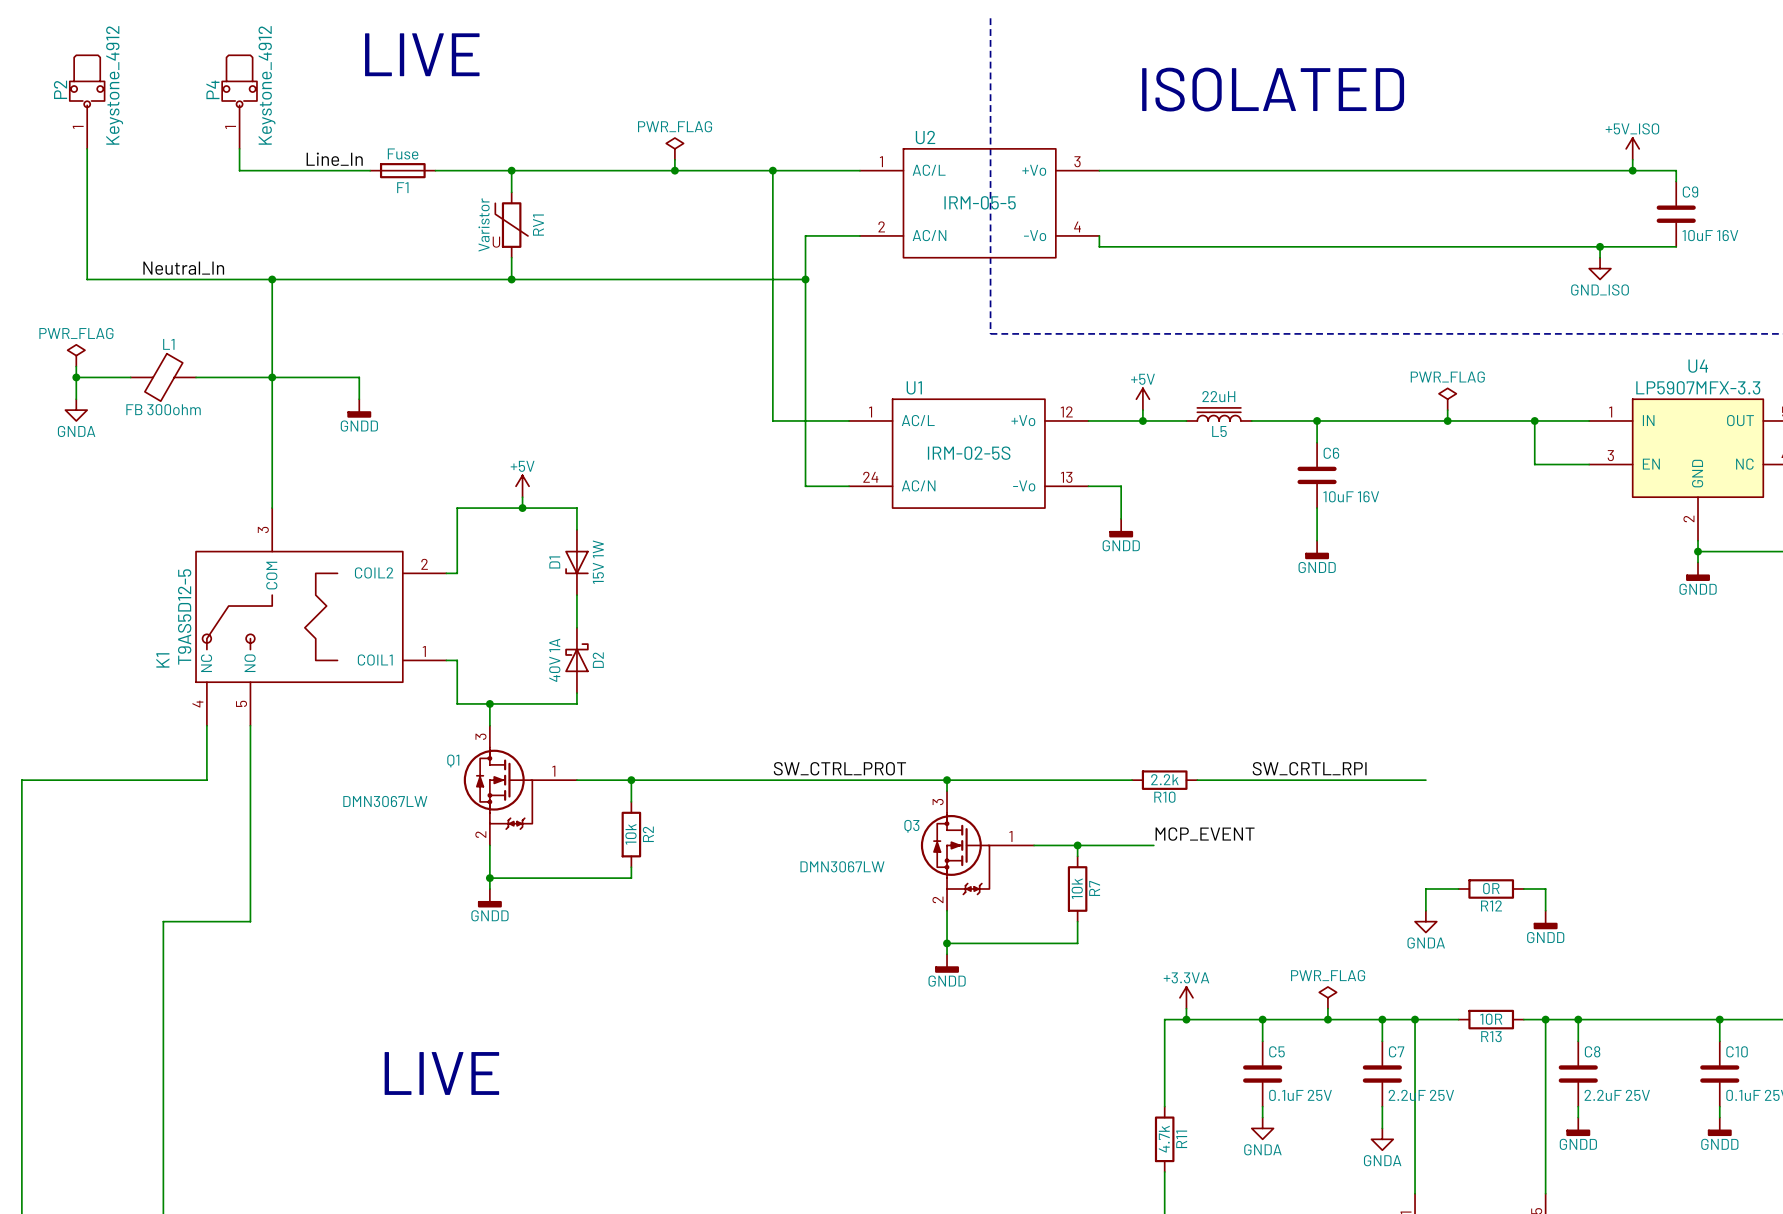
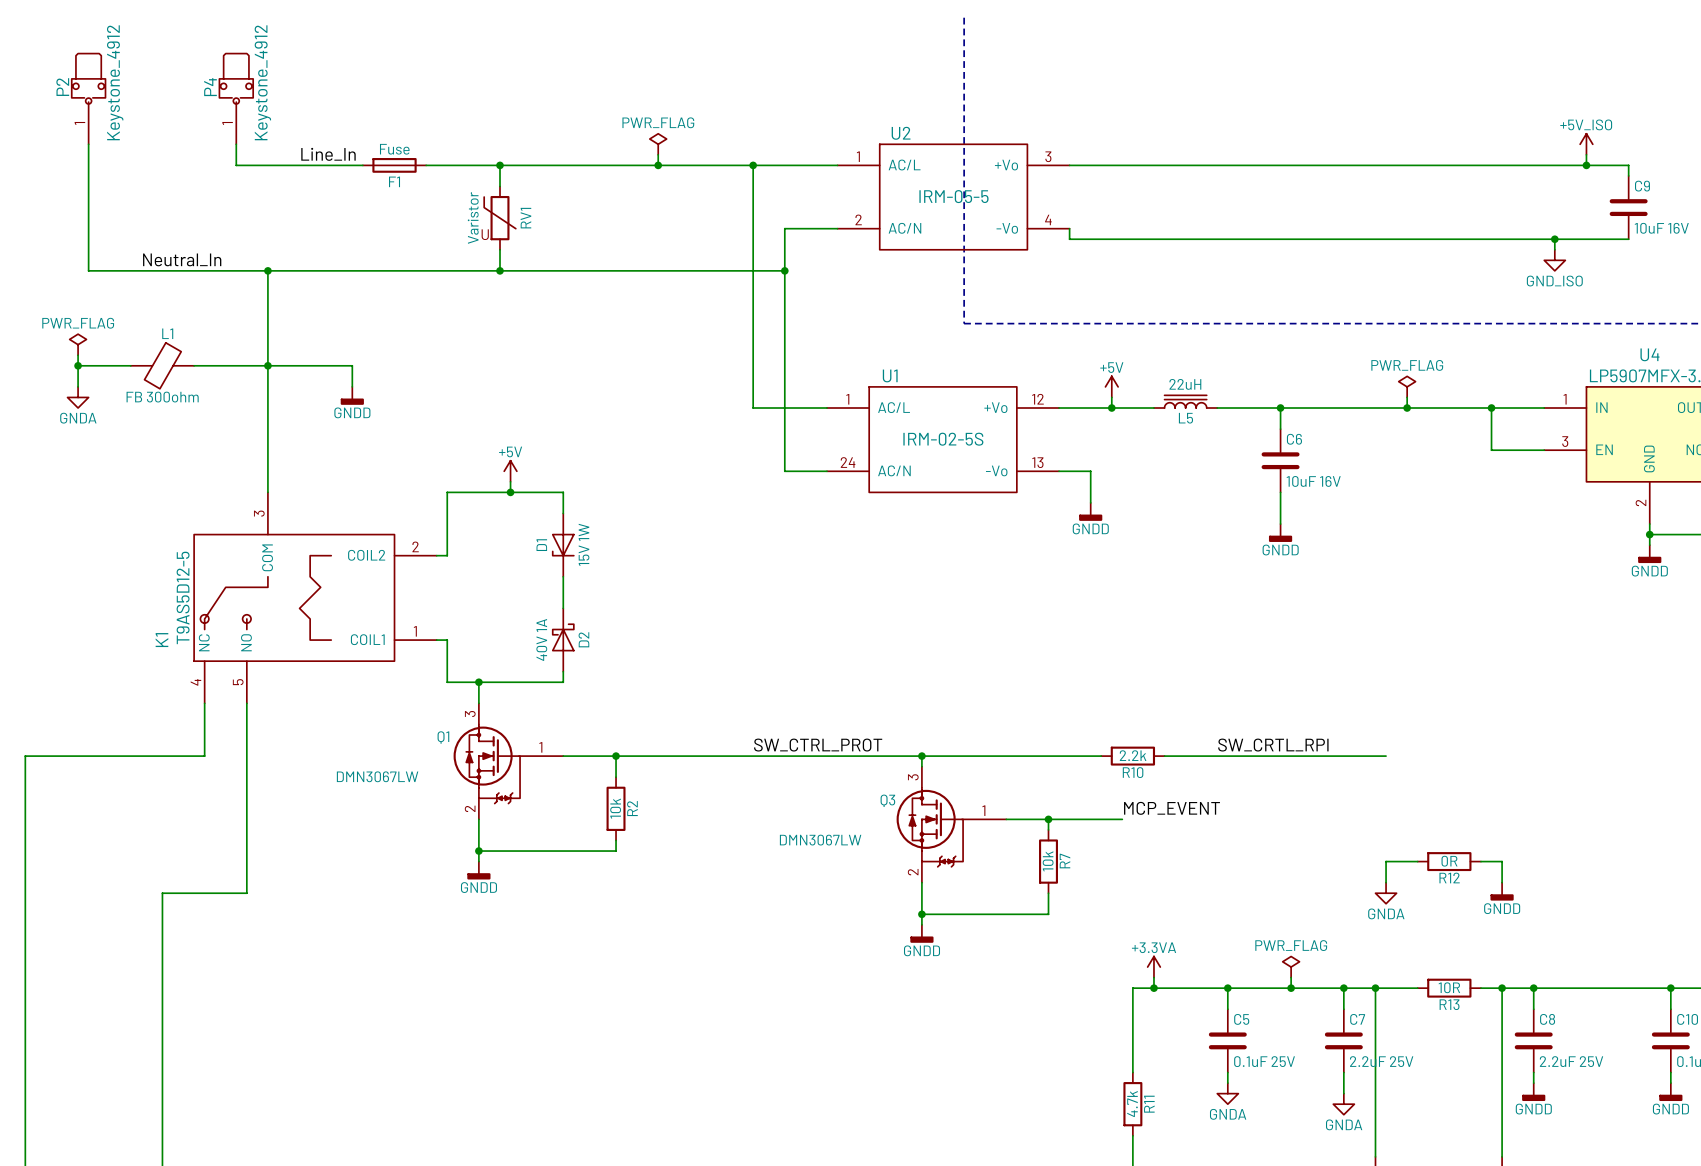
text: LIVE (422, 54) -> none
text: ISOLATED (1273, 89) -> none
text: LIVE (441, 1073) -> none

